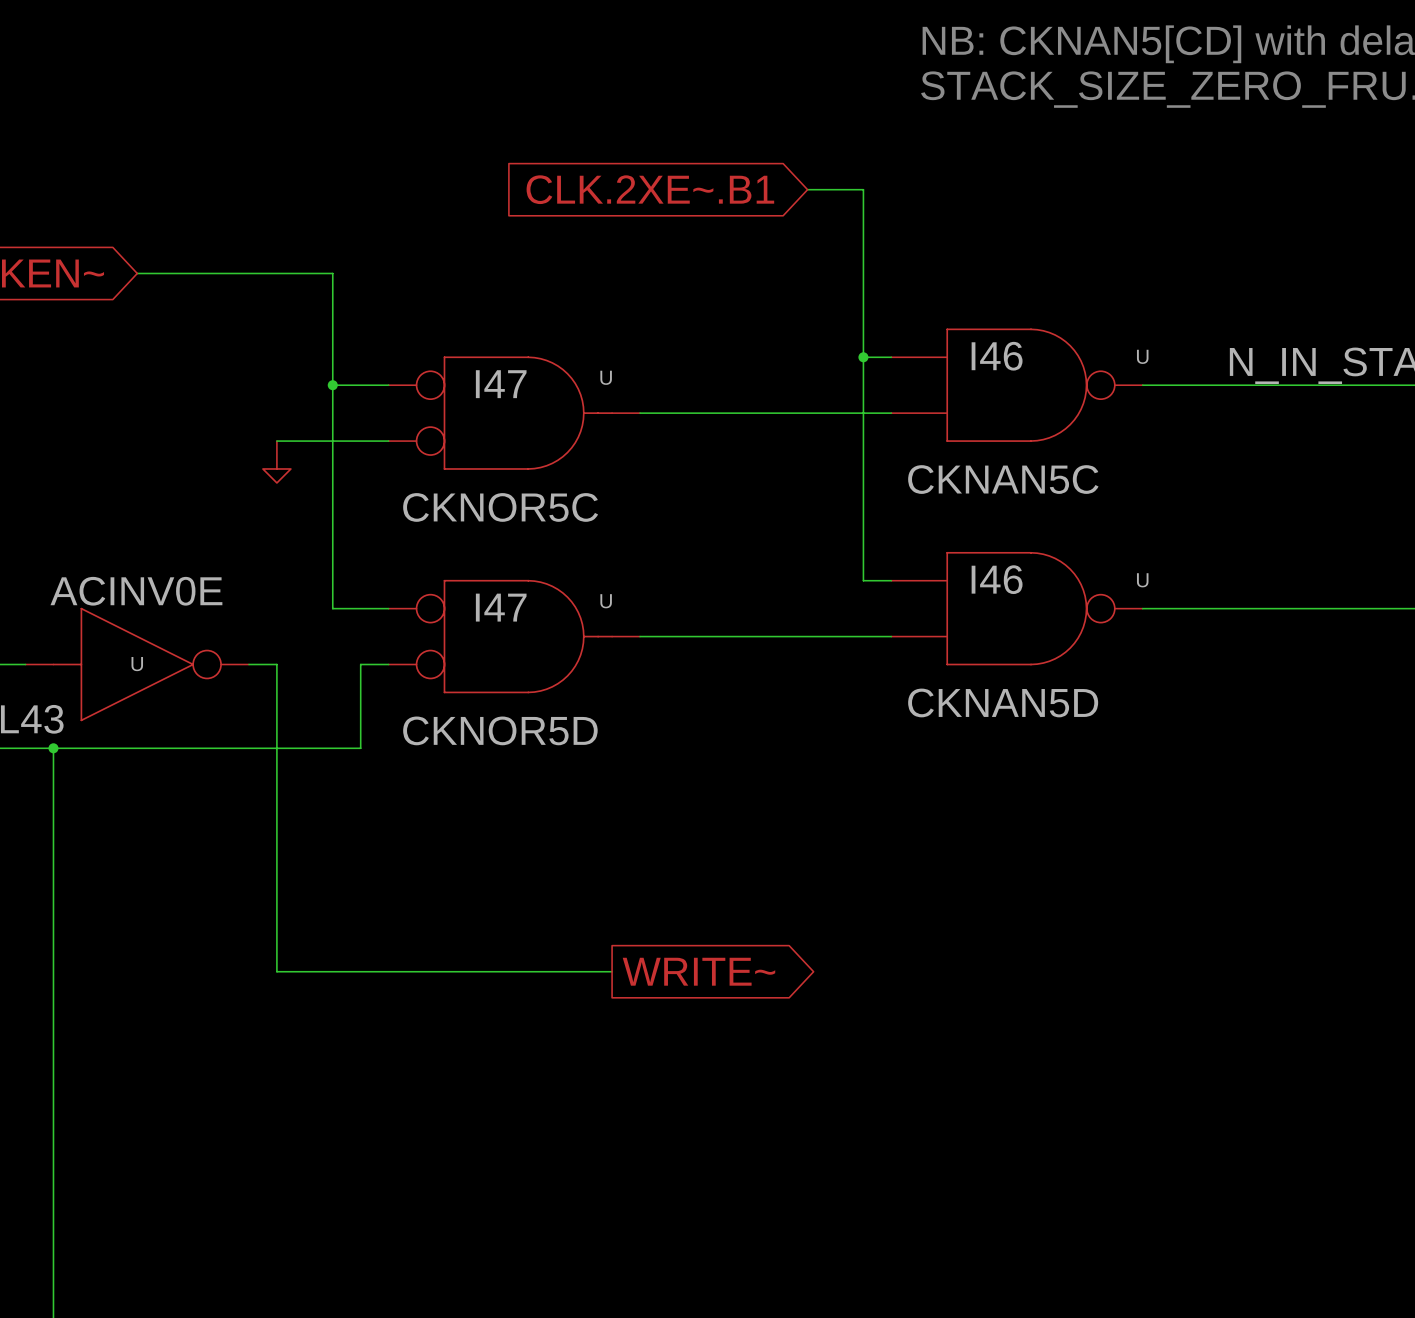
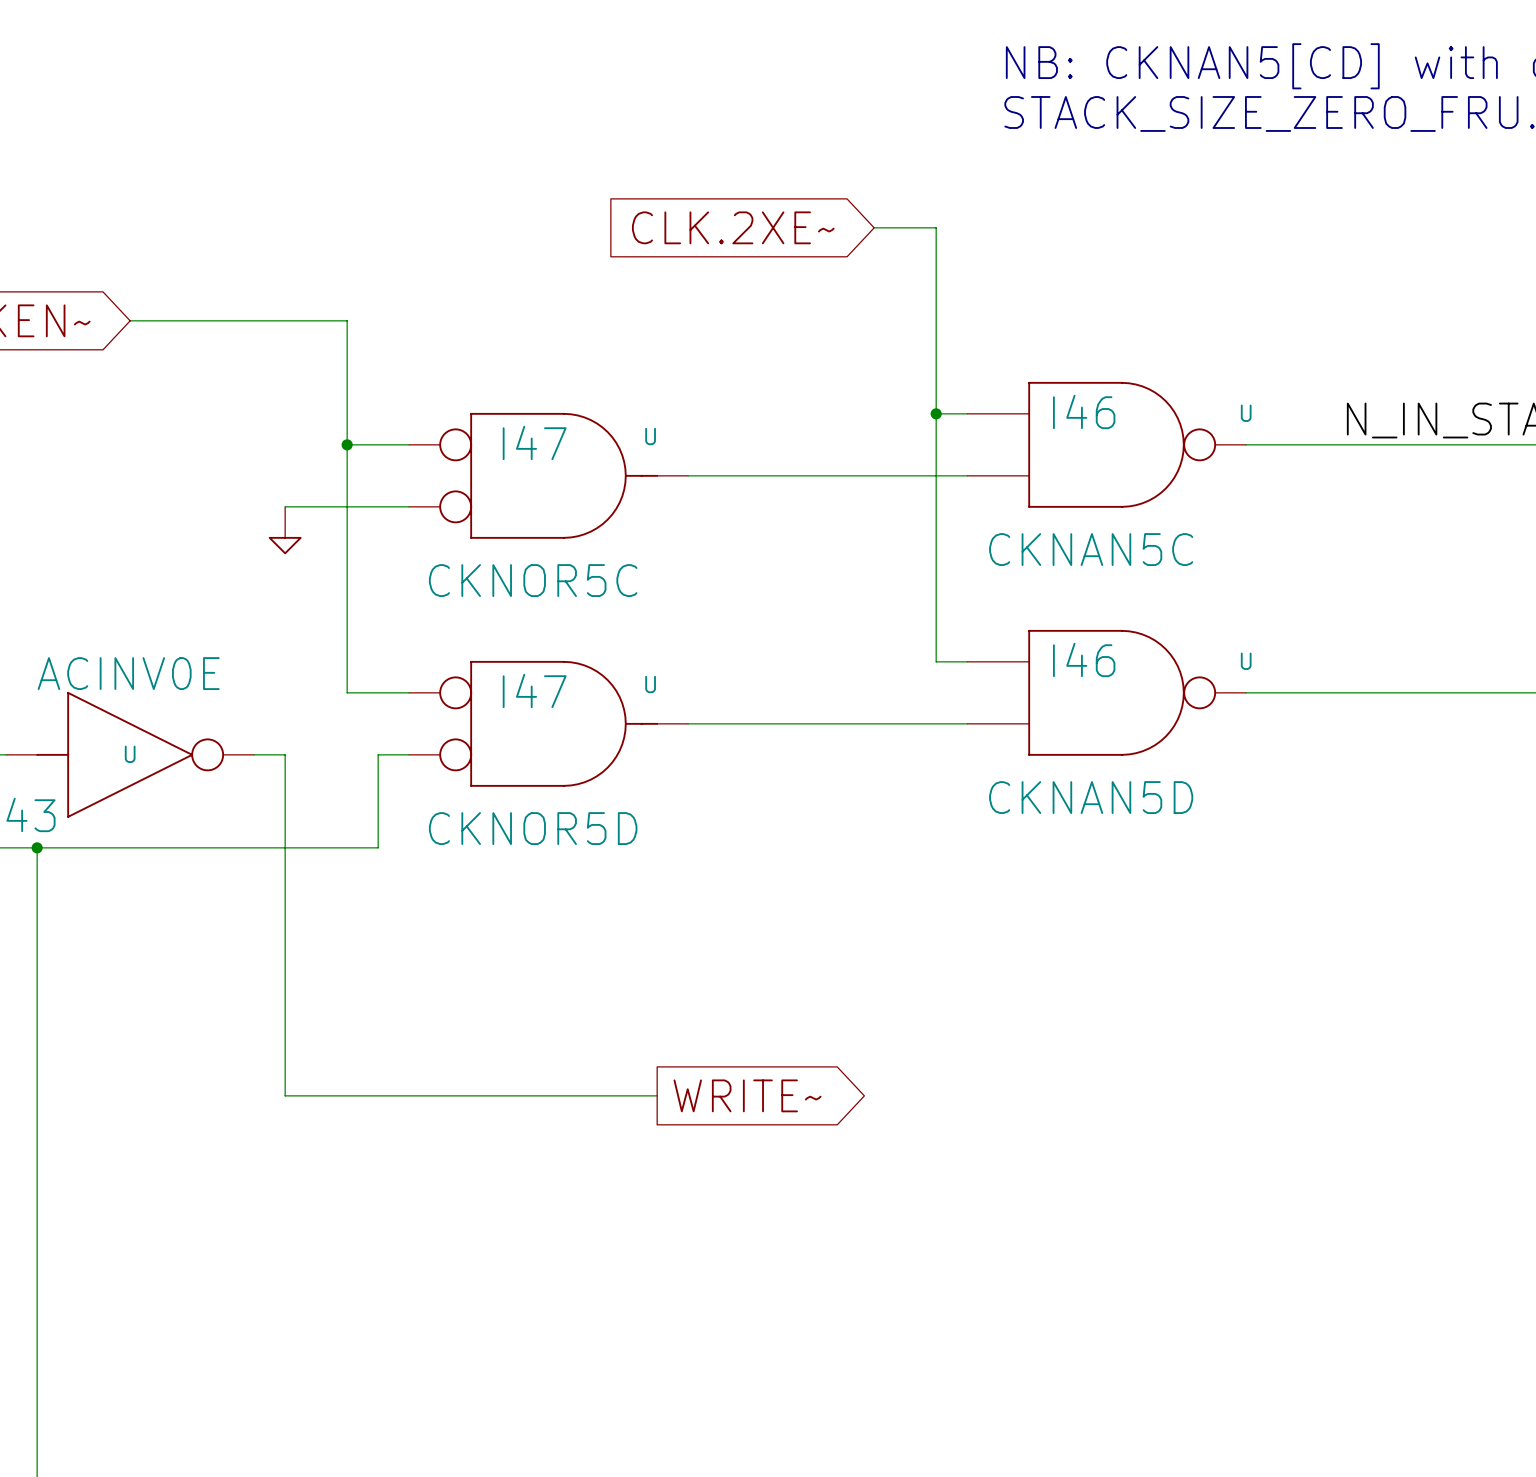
global label: CLK.2XE~.B1 (650, 189) -> CLK.2XE~ (733, 227)

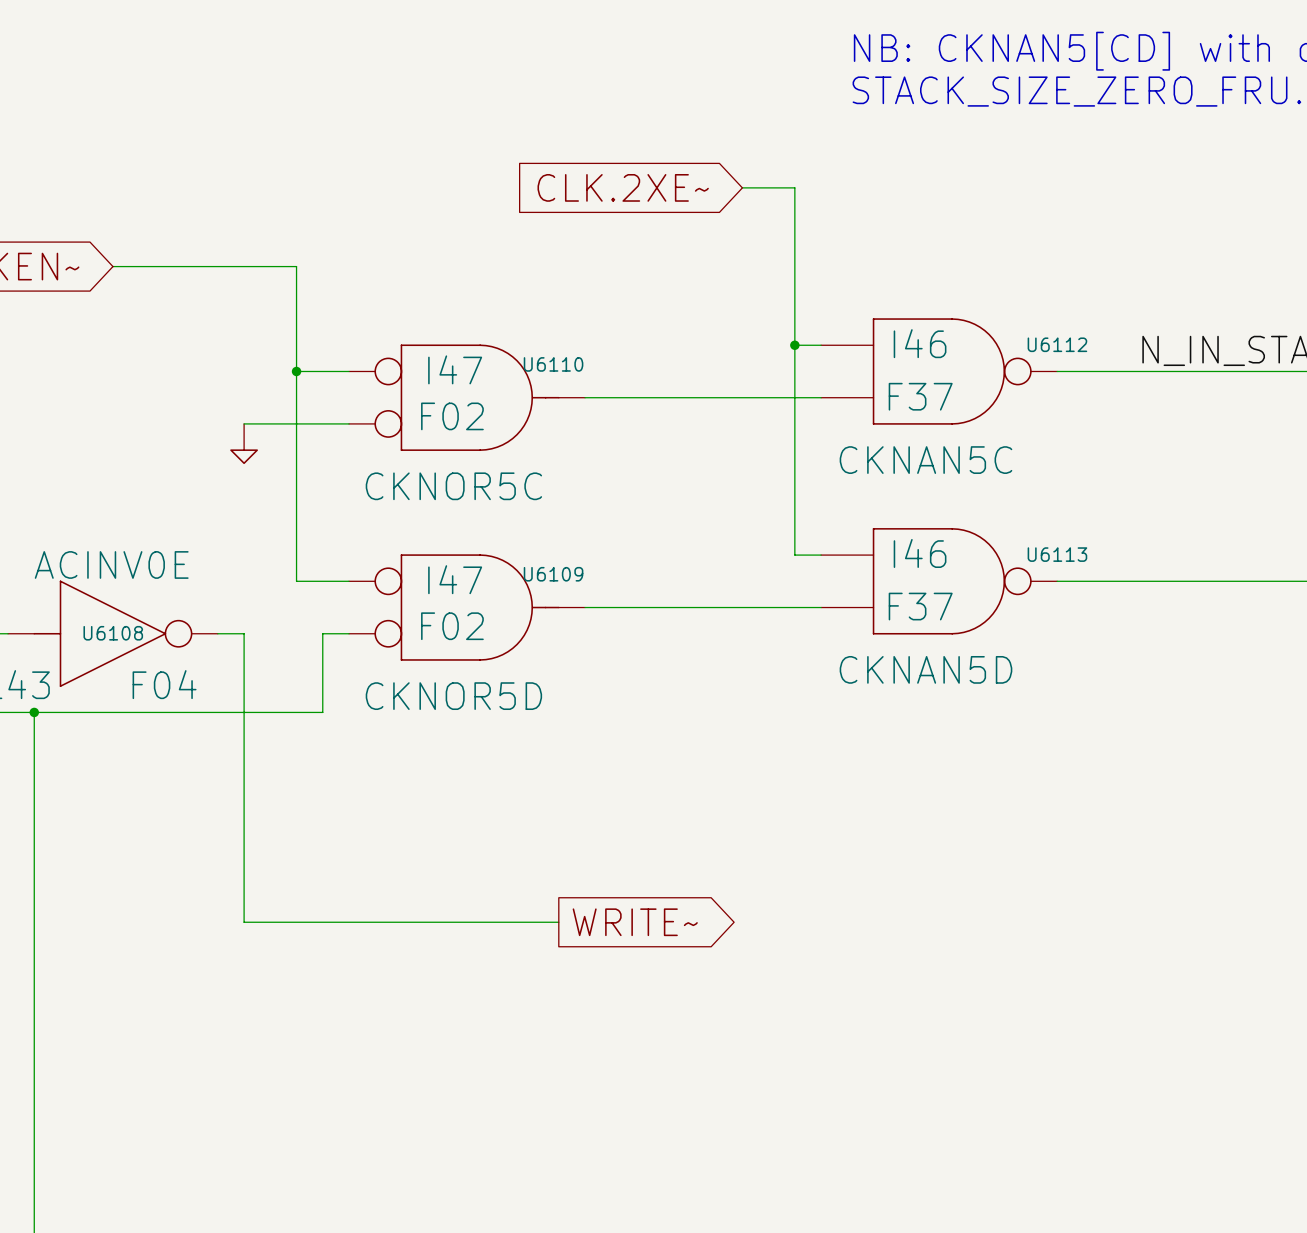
U name: U (1246, 413) -> U6112 (1057, 344)
U name: U (650, 436) -> U6110 (553, 364)
U value: none -> F37 (920, 396)
U value: none -> F02 (452, 416)
U name: U (1246, 661) -> U6113 (1057, 554)
U name: U (650, 684) -> U6109 (553, 574)
U value: none -> F37 (920, 606)
U value: none -> F02 (452, 626)
U name: U (130, 754) -> U6108 (113, 633)
U value: none -> F04 (164, 684)

